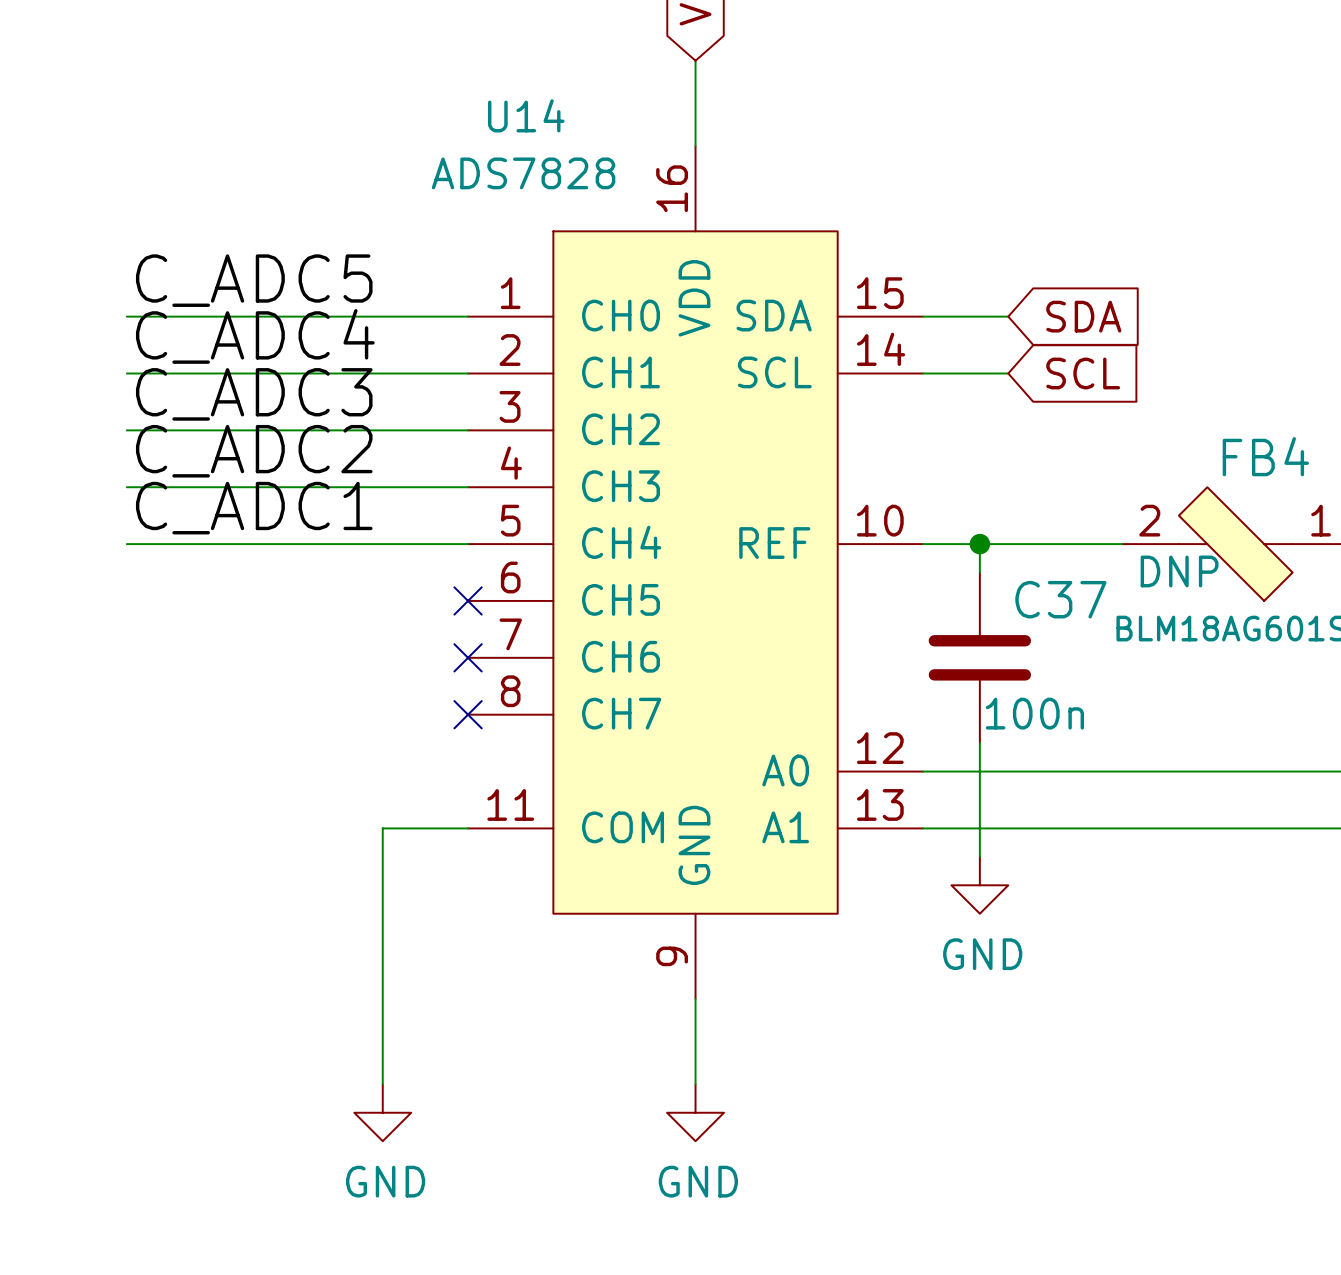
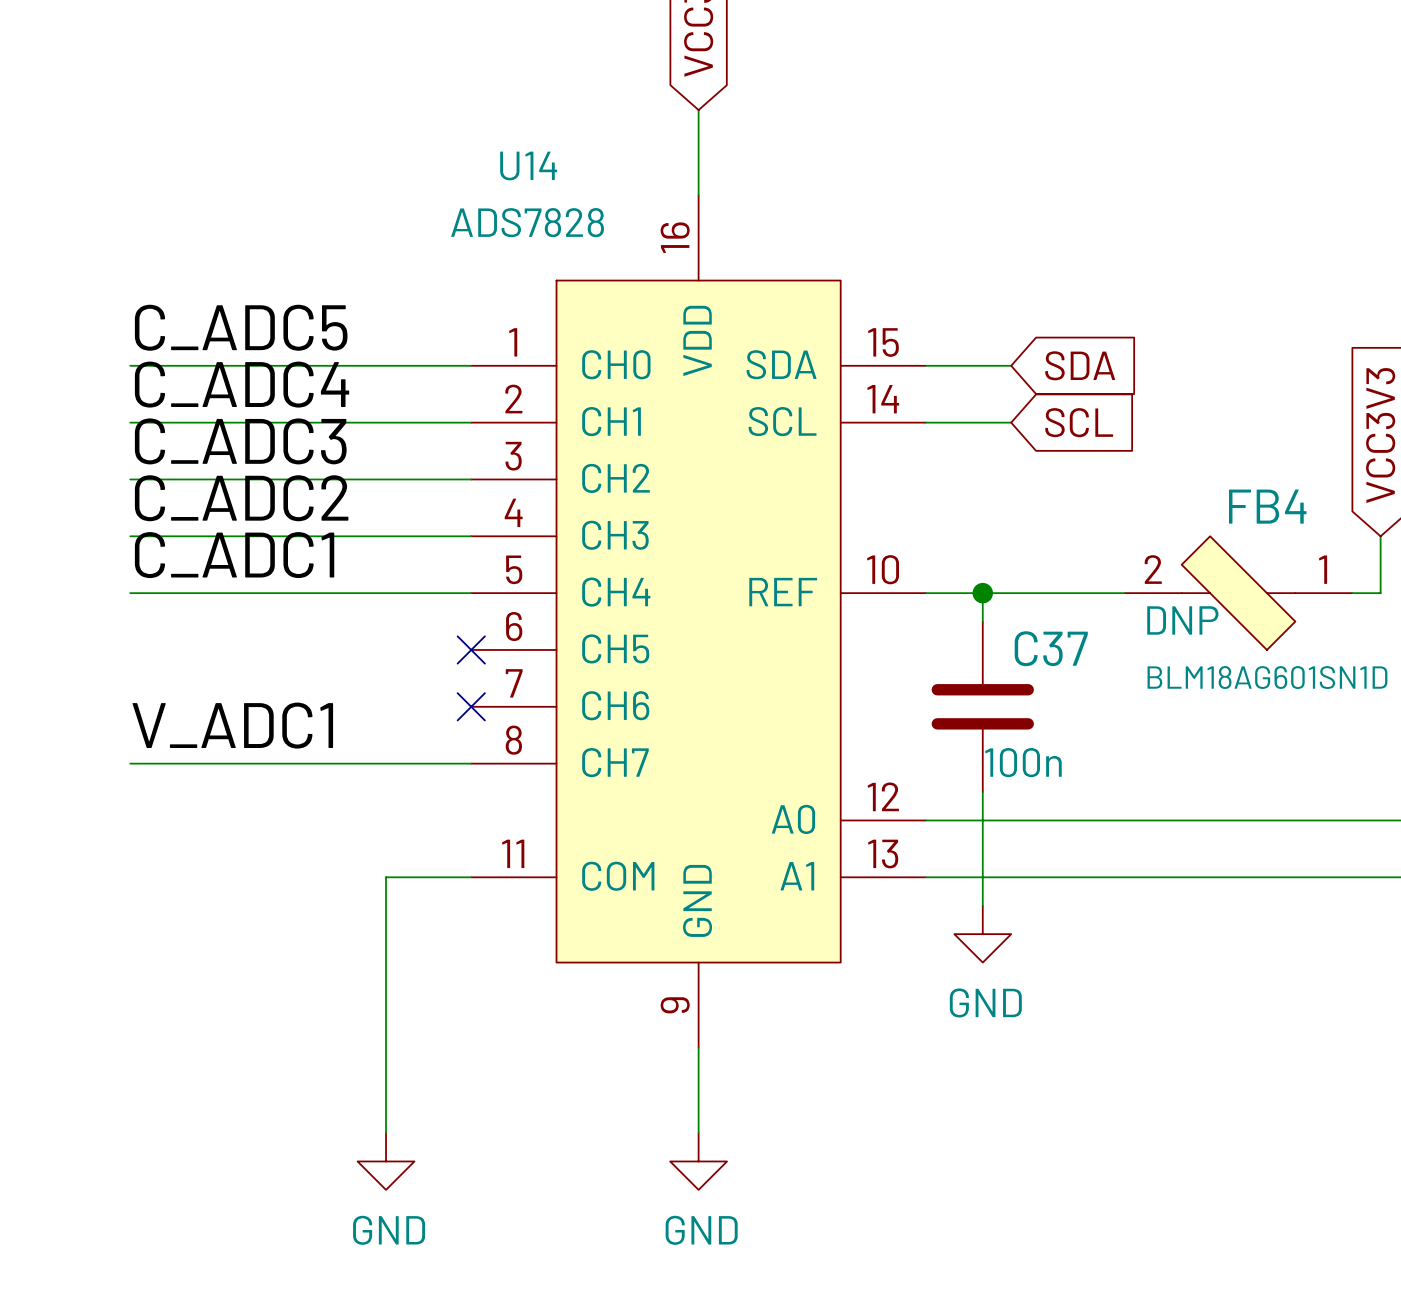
label: none -> V_ADC1 (232, 725)
wire: none -> (130, 763) (471, 763)
no-connect mark: (468, 714) -> none

